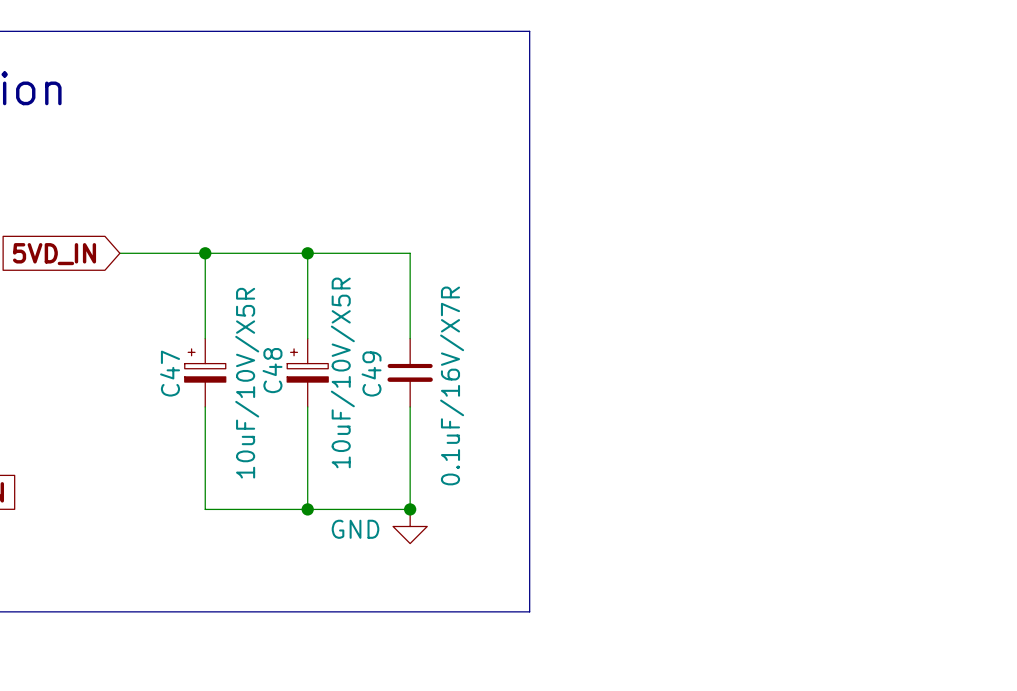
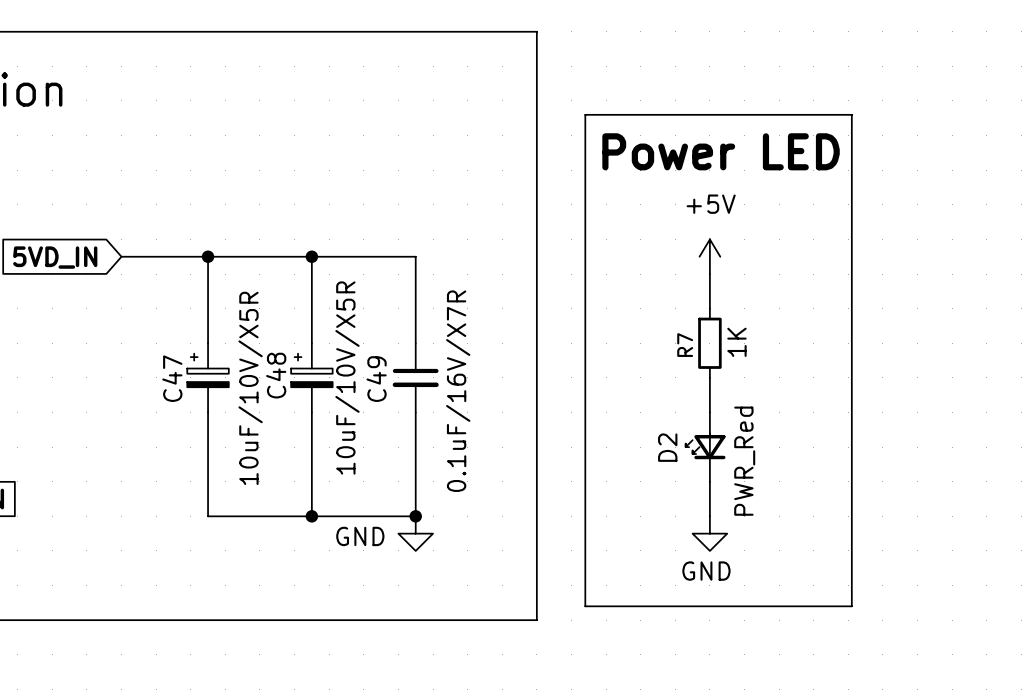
line: none -> (585, 114) (851, 114) (851, 606) (585, 606) (585, 114)
text: none -> Power LED (721, 151)
power symbol: none -> +5V (709, 256)
wire: none -> (709, 274) (709, 308)
R7: none -> 1K (709, 343)
wire: none -> (709, 377) (709, 412)
D2: none -> PWR_Red (705, 447)
wire: none -> (709, 481) (709, 516)
power symbol: none -> GND (709, 533)

